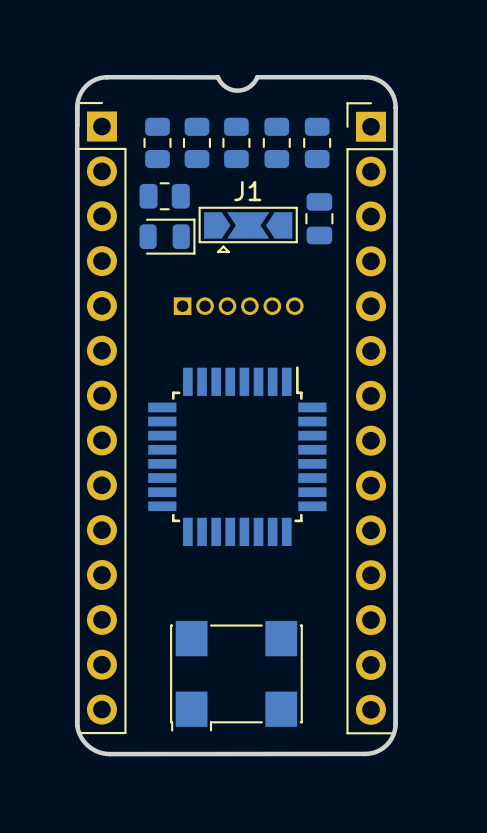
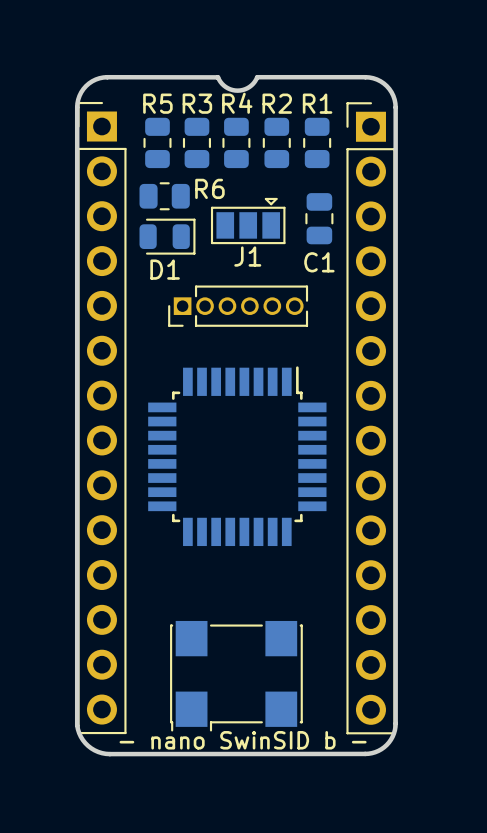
R5 name: none -> R5 (157, 103)
R3 name: none -> R3 (197, 103)
R4 name: none -> R4 (237, 103)
R2 name: none -> R2 (277, 103)
R1 name: none -> R1 (317, 103)
R6 name: none -> R6 (209, 188)
J1 name position: J1 (247, 191) -> J1 (247, 256)
J1 footprint: [198, 206, 298, 253] -> [210, 197, 286, 245]
C1 name: none -> C1 (319, 262)
D1 name: none -> D1 (165, 269)
part side: top (238, 306) -> bottom (238, 306)
text: none -> - nano SwinSID b - (243, 740)

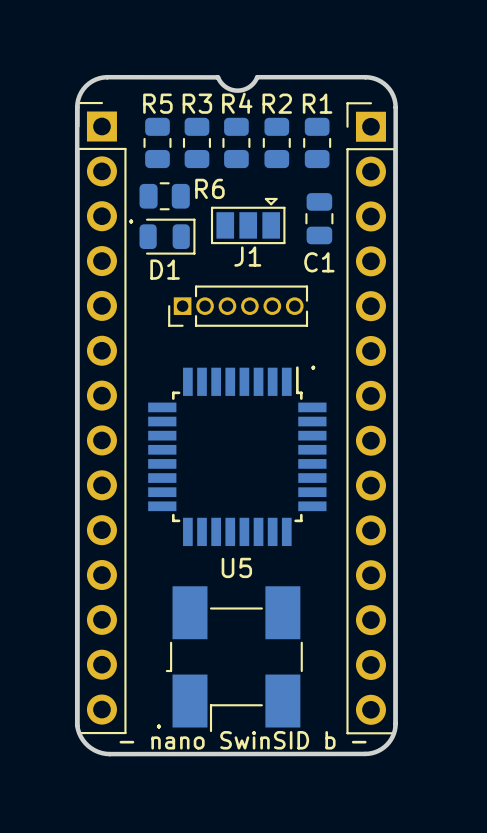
text: none -> . (131, 221)
text: none -> . (313, 367)
U5: none -> (234, 659)
part: (236, 676) -> none
text: none -> . (158, 726)

